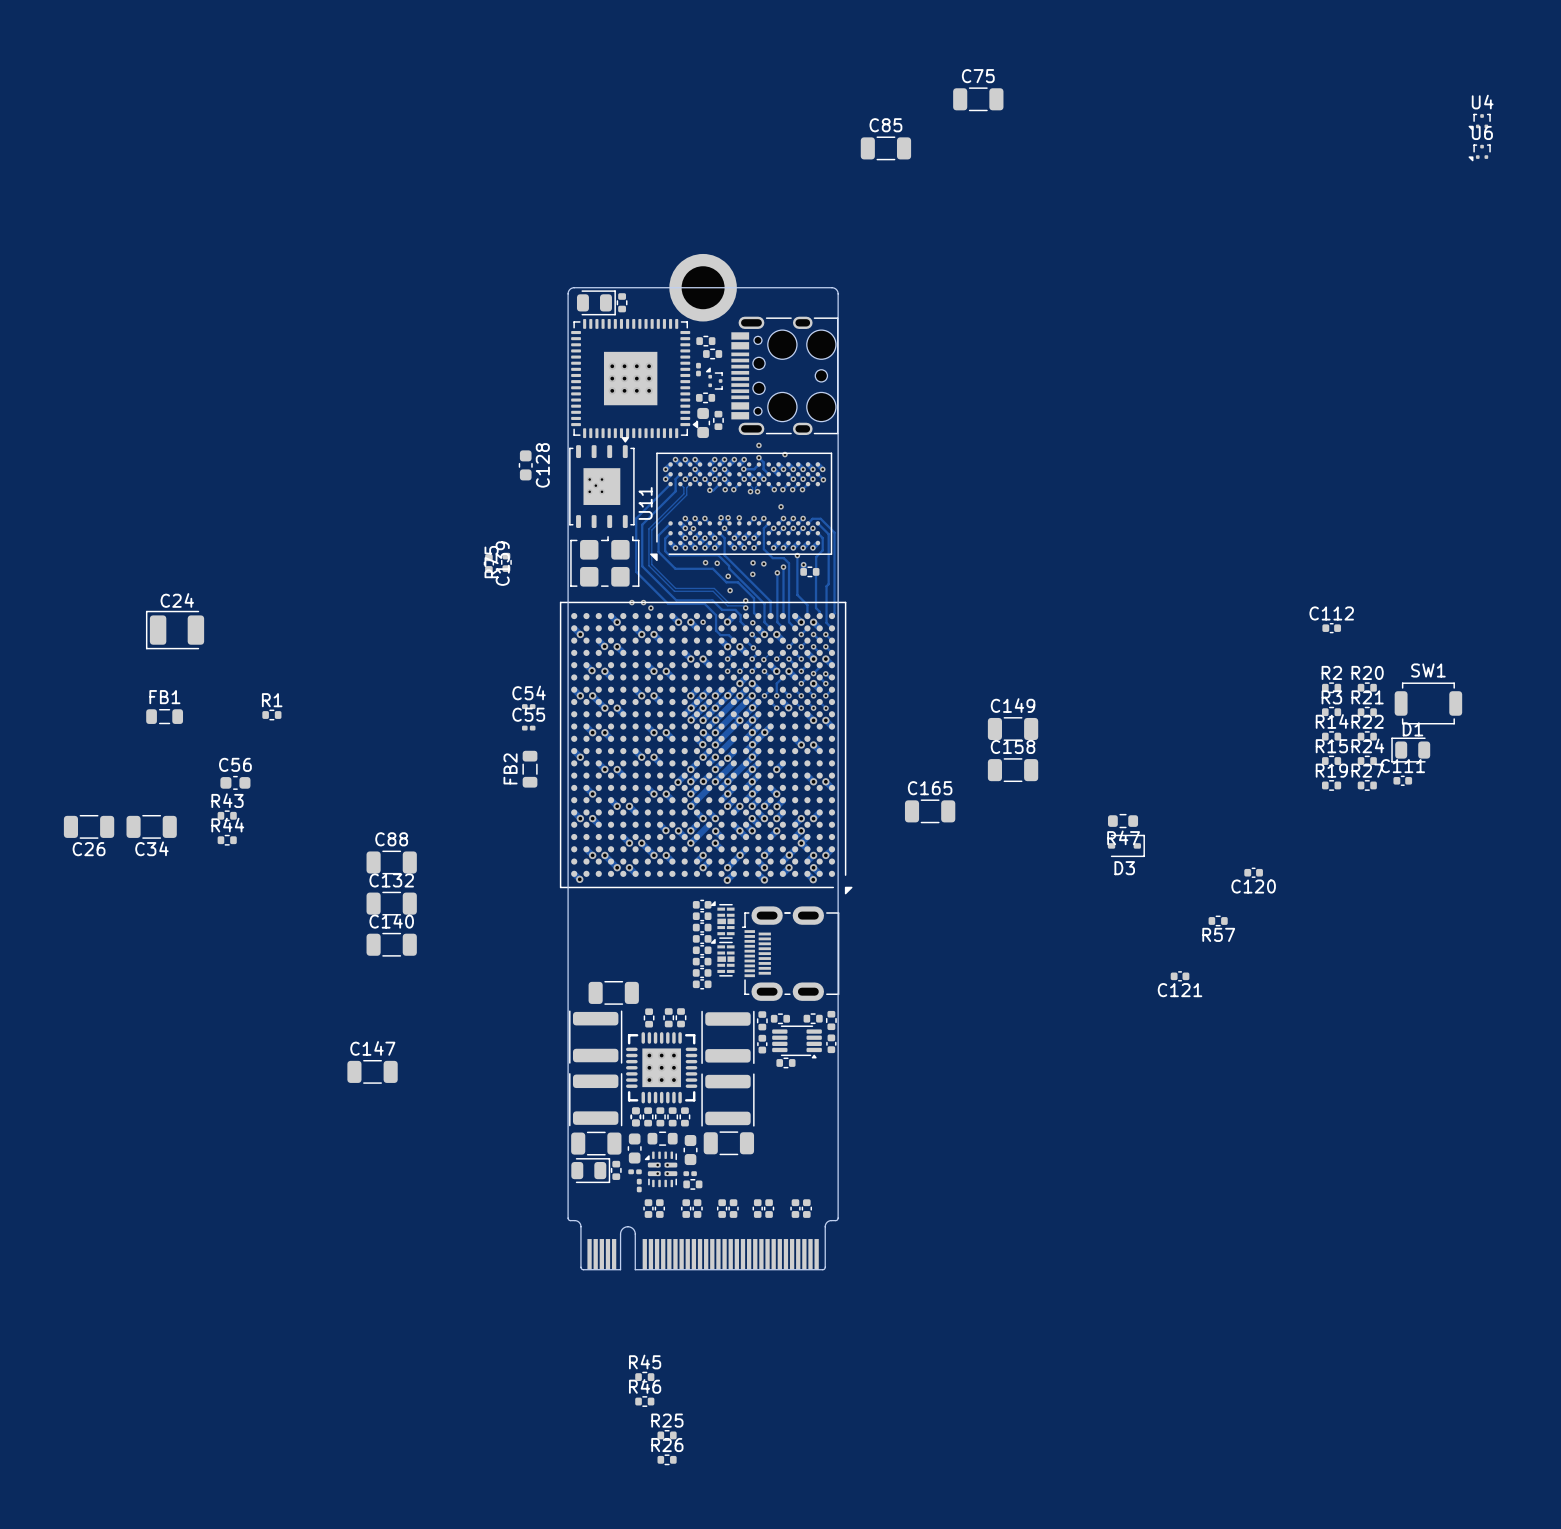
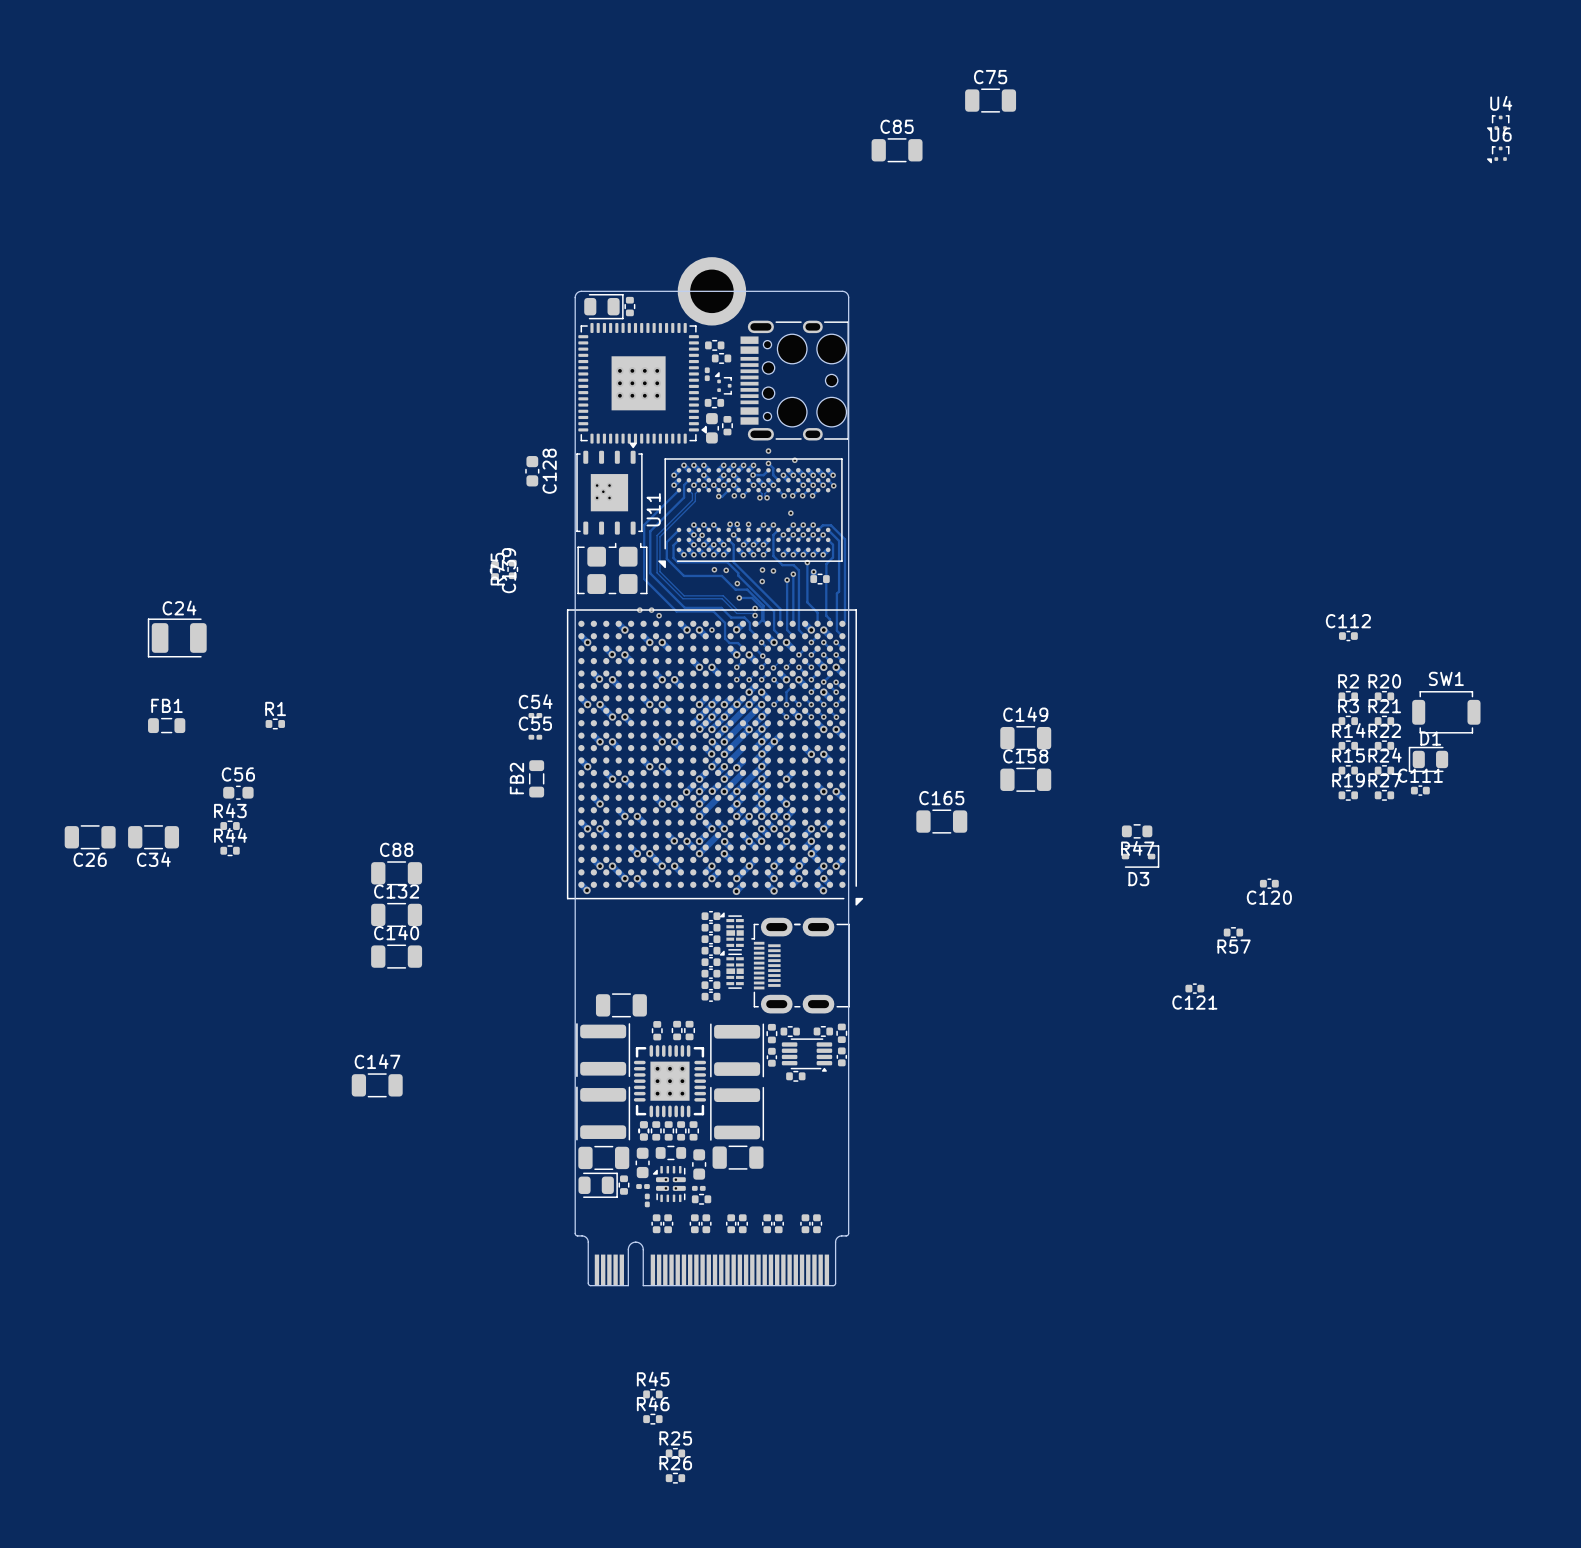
track: none -> (739, 597) (751, 597) (762, 608) (762, 620) (755, 623)
via: (752, 622) -> none

